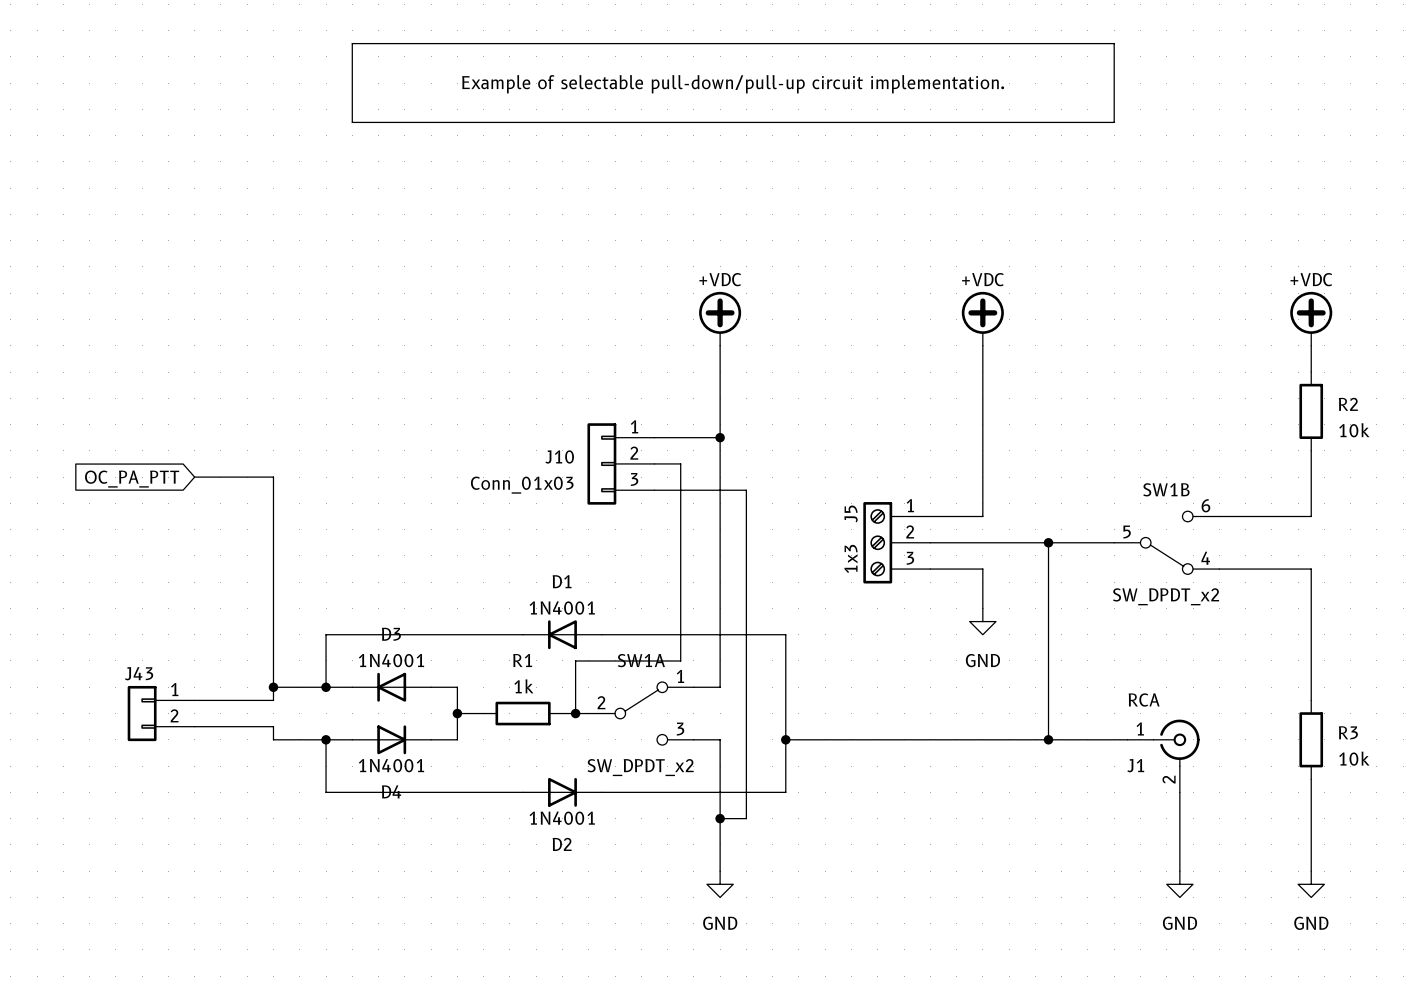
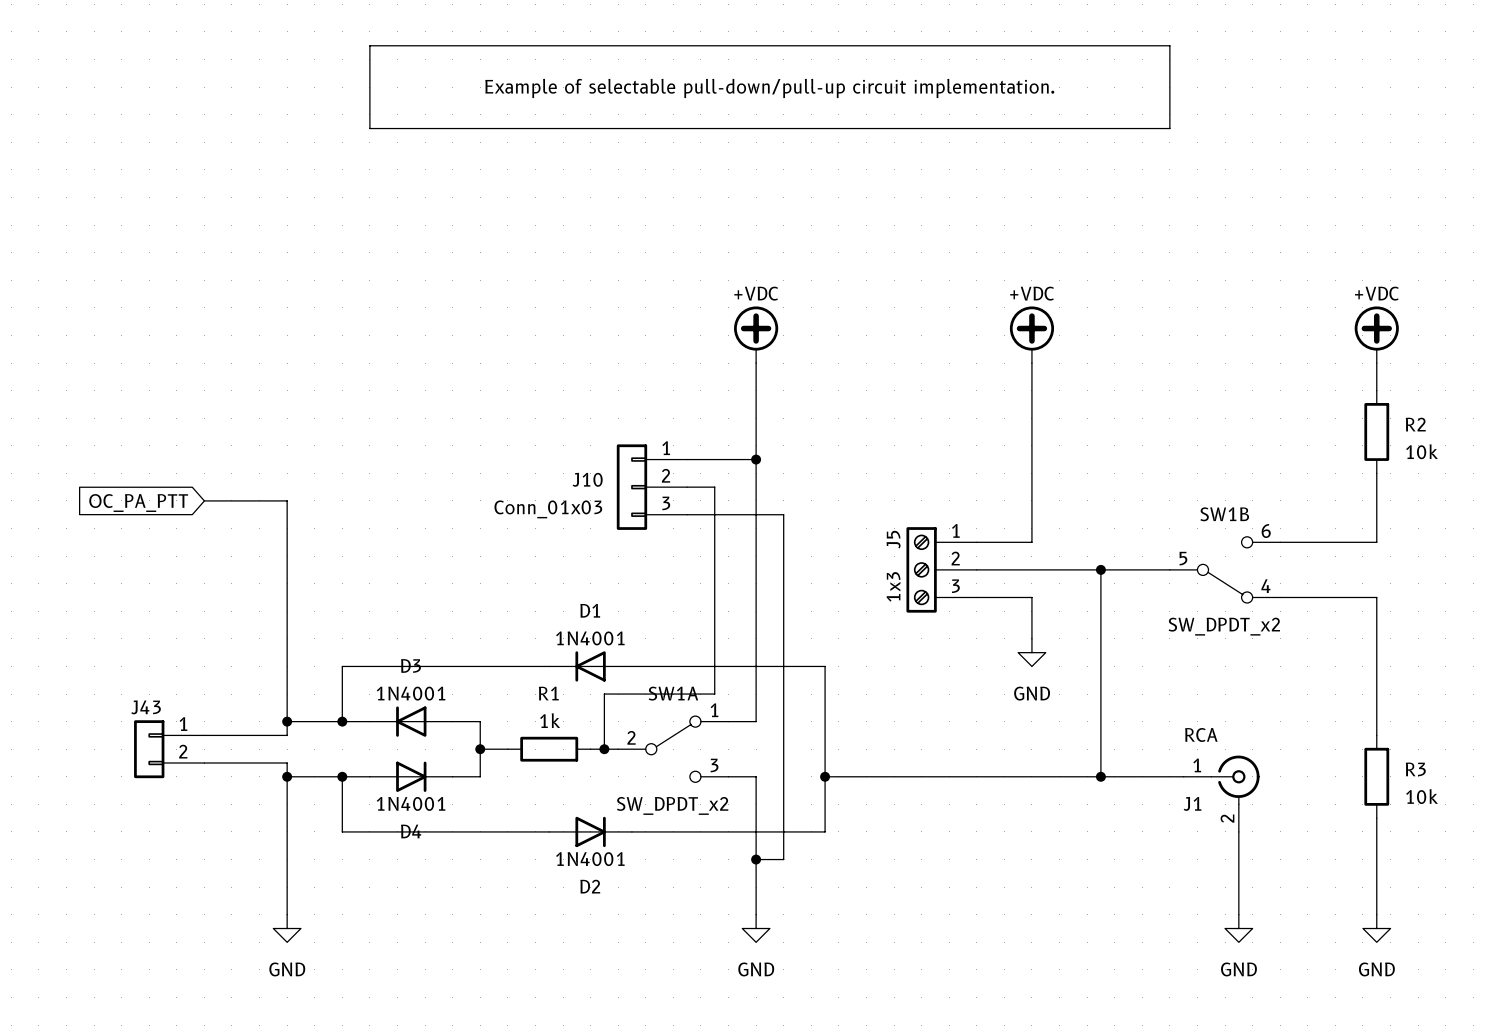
wire: none -> (287, 776) (287, 914)
junction: none -> (287, 776)
power symbol: none -> GND (287, 928)

